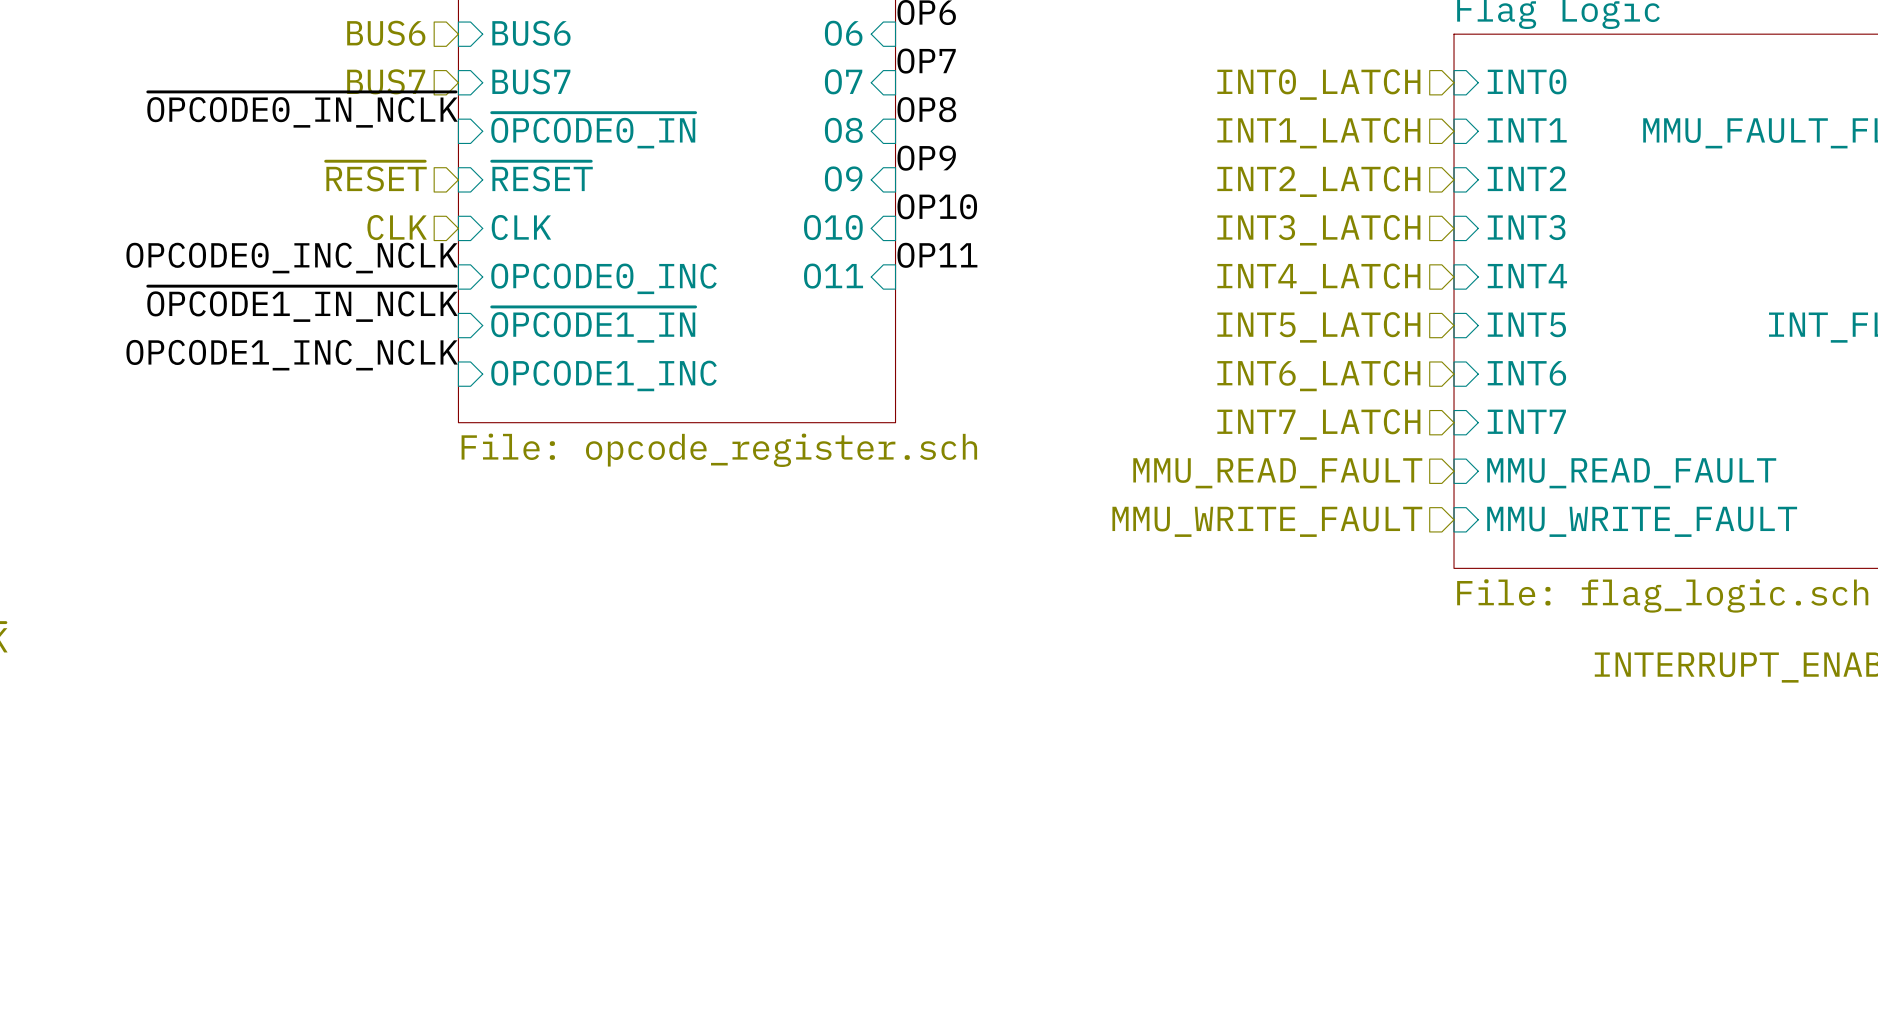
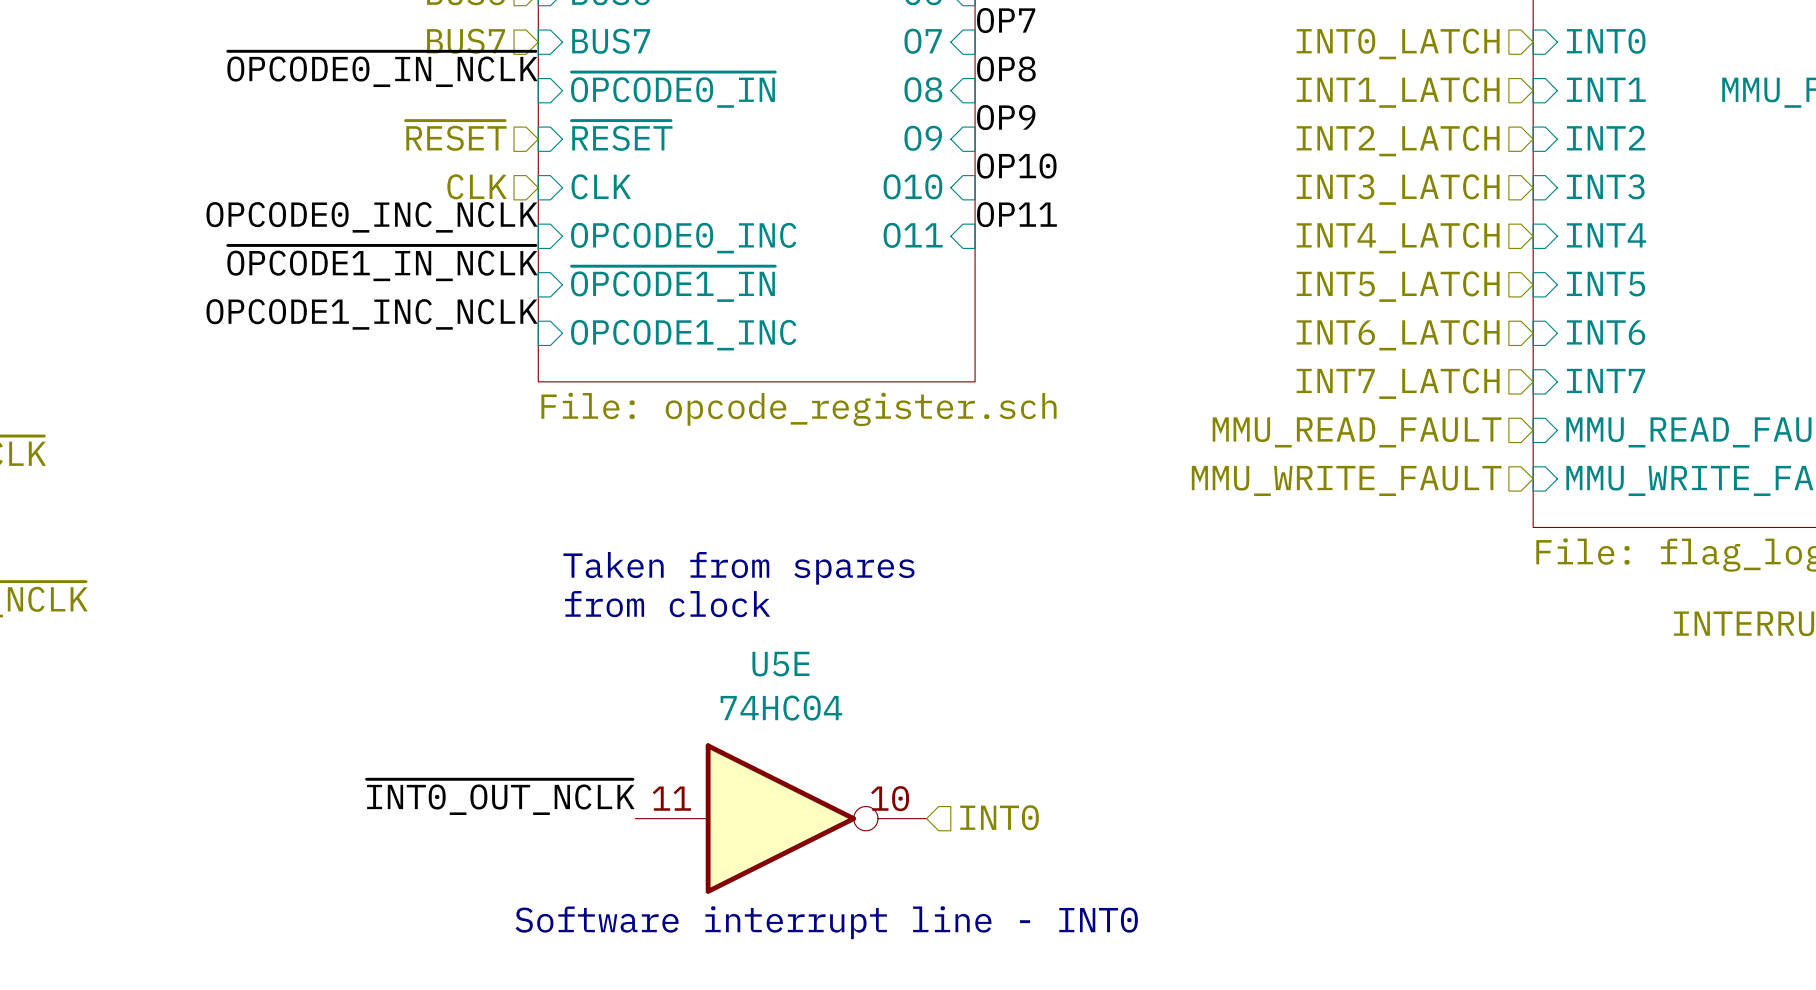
text: none -> Taken from spares (738, 568)
text: none -> from clock (667, 604)
label: none -> ~{INT0_OUT_NCLK} (500, 797)
hierarchical label: none -> INT0 (999, 817)
U5E: none -> 74HC04 (780, 818)
text: none -> Software interrupt line - INT0 (826, 922)

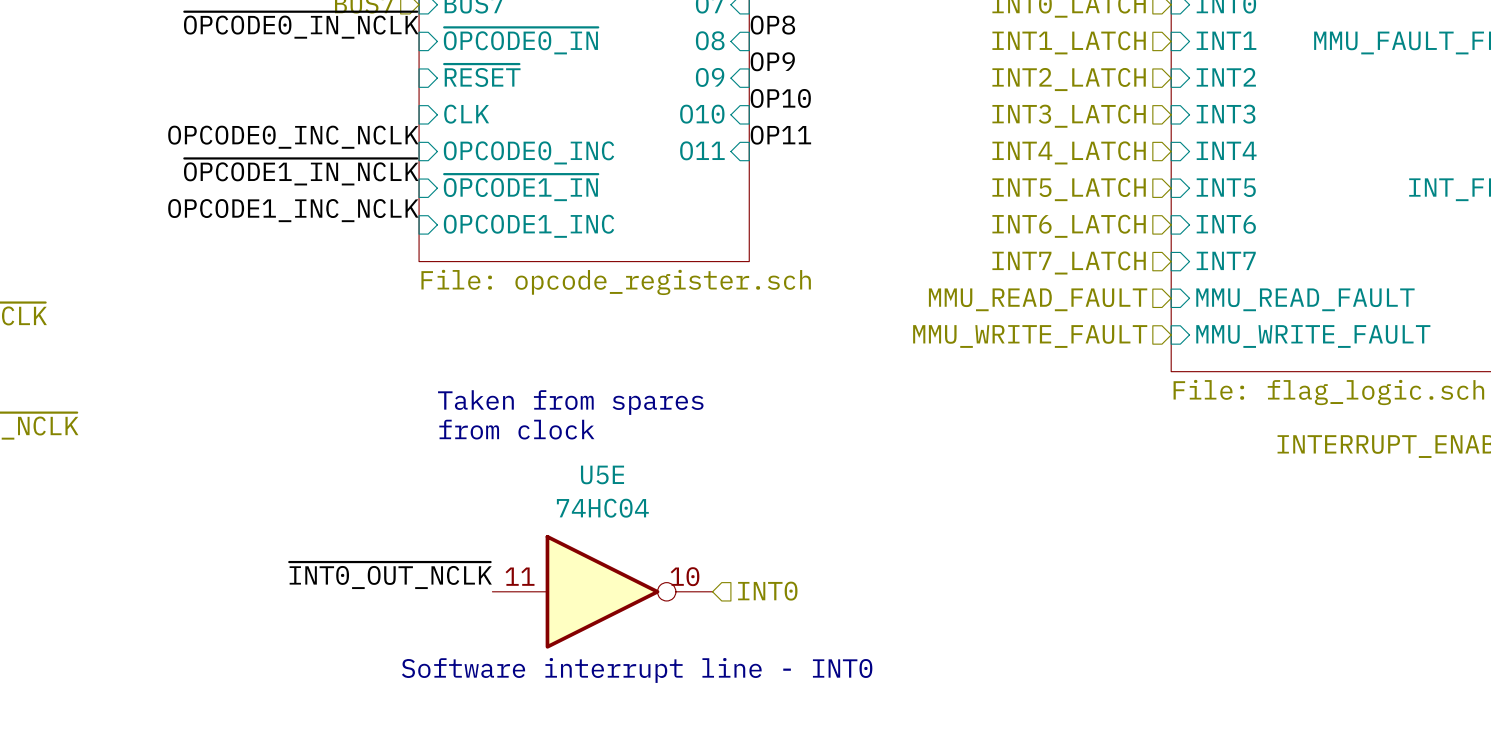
hierarchical label: ~{RESET} (456, 135) -> none
hierarchical label: CLK (477, 186) -> none

